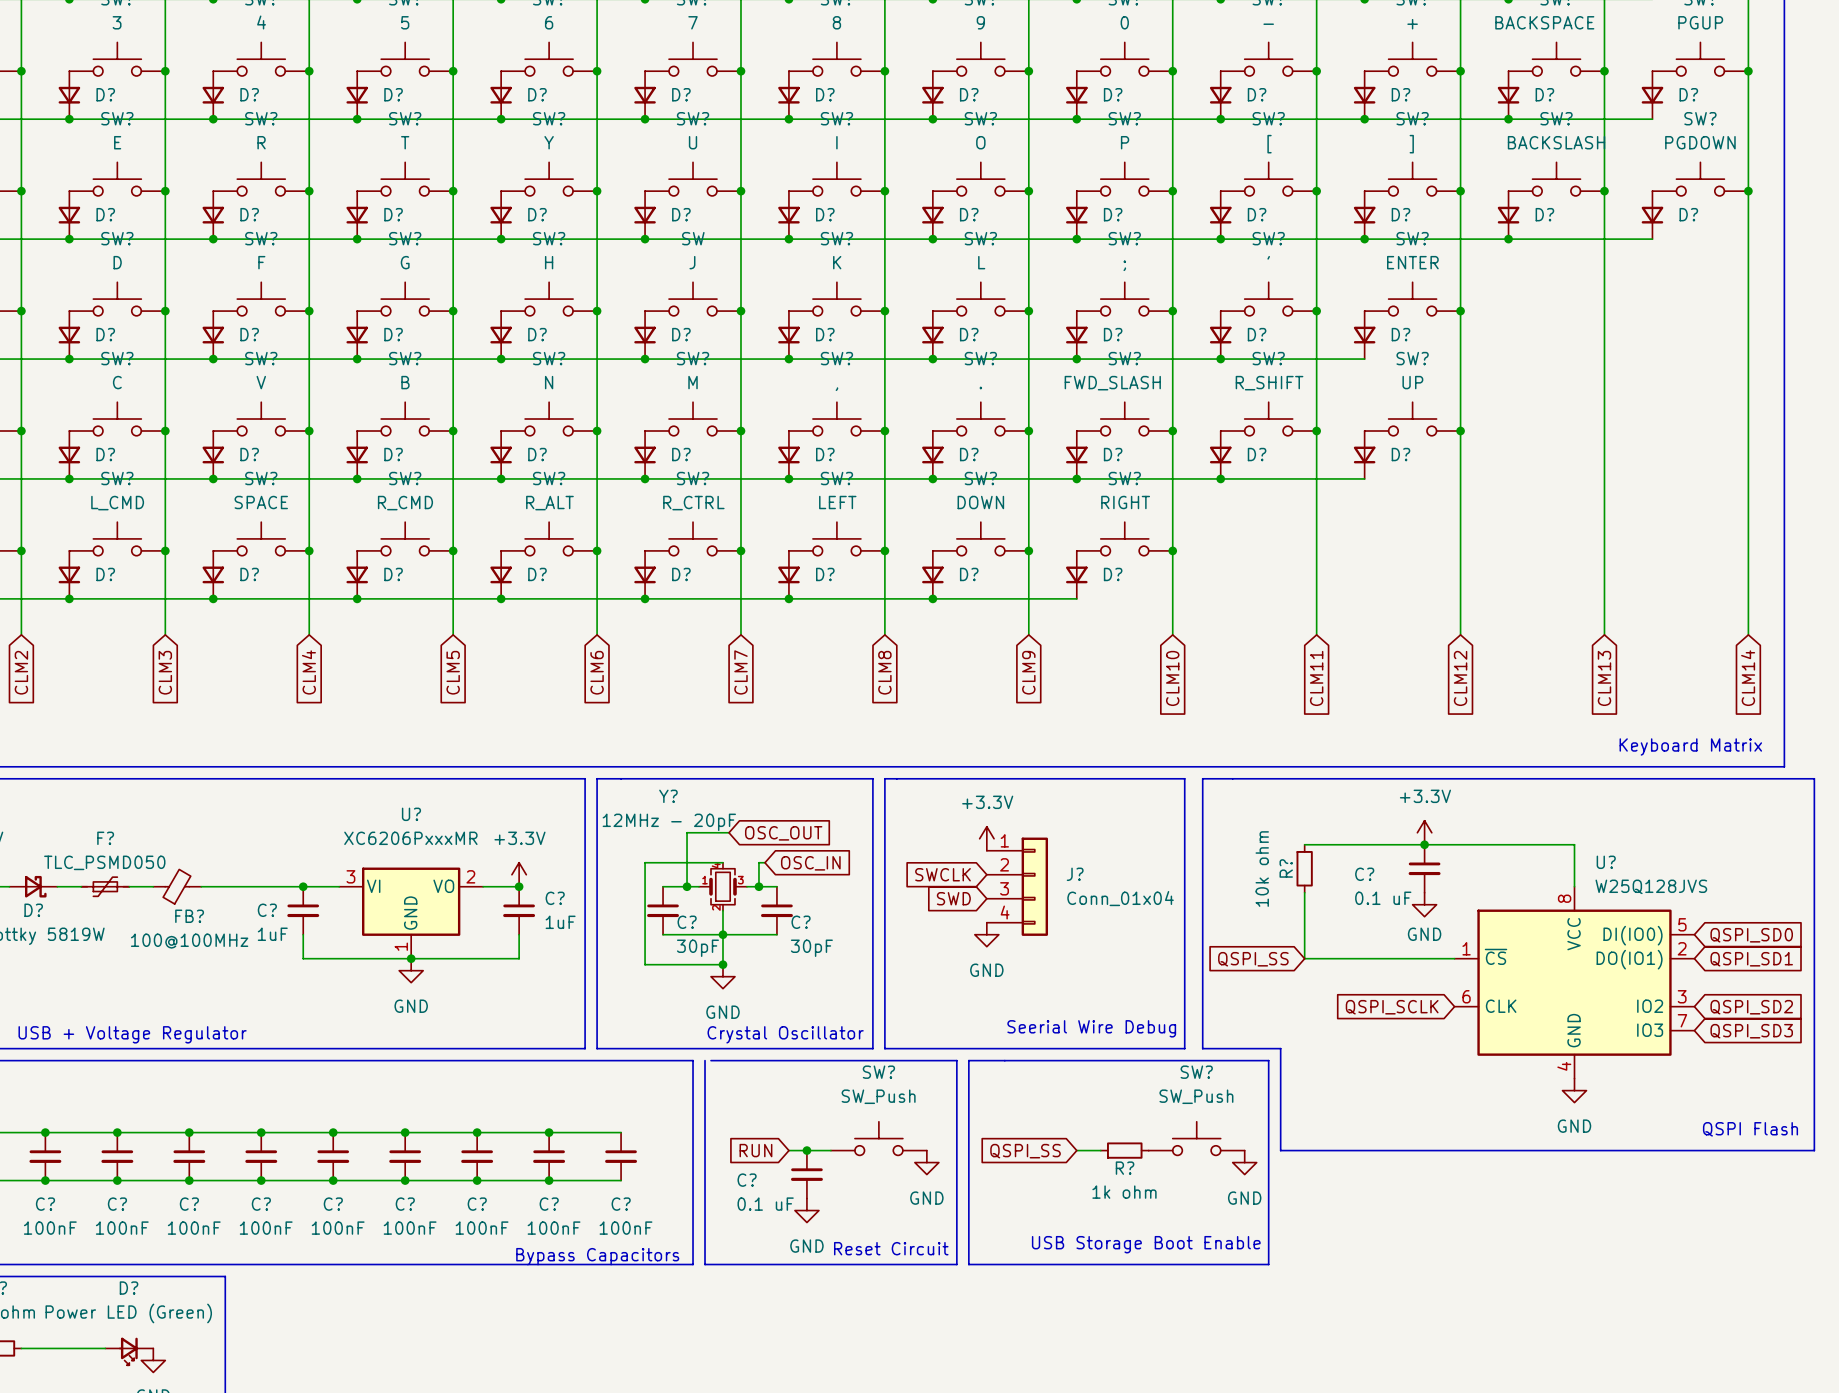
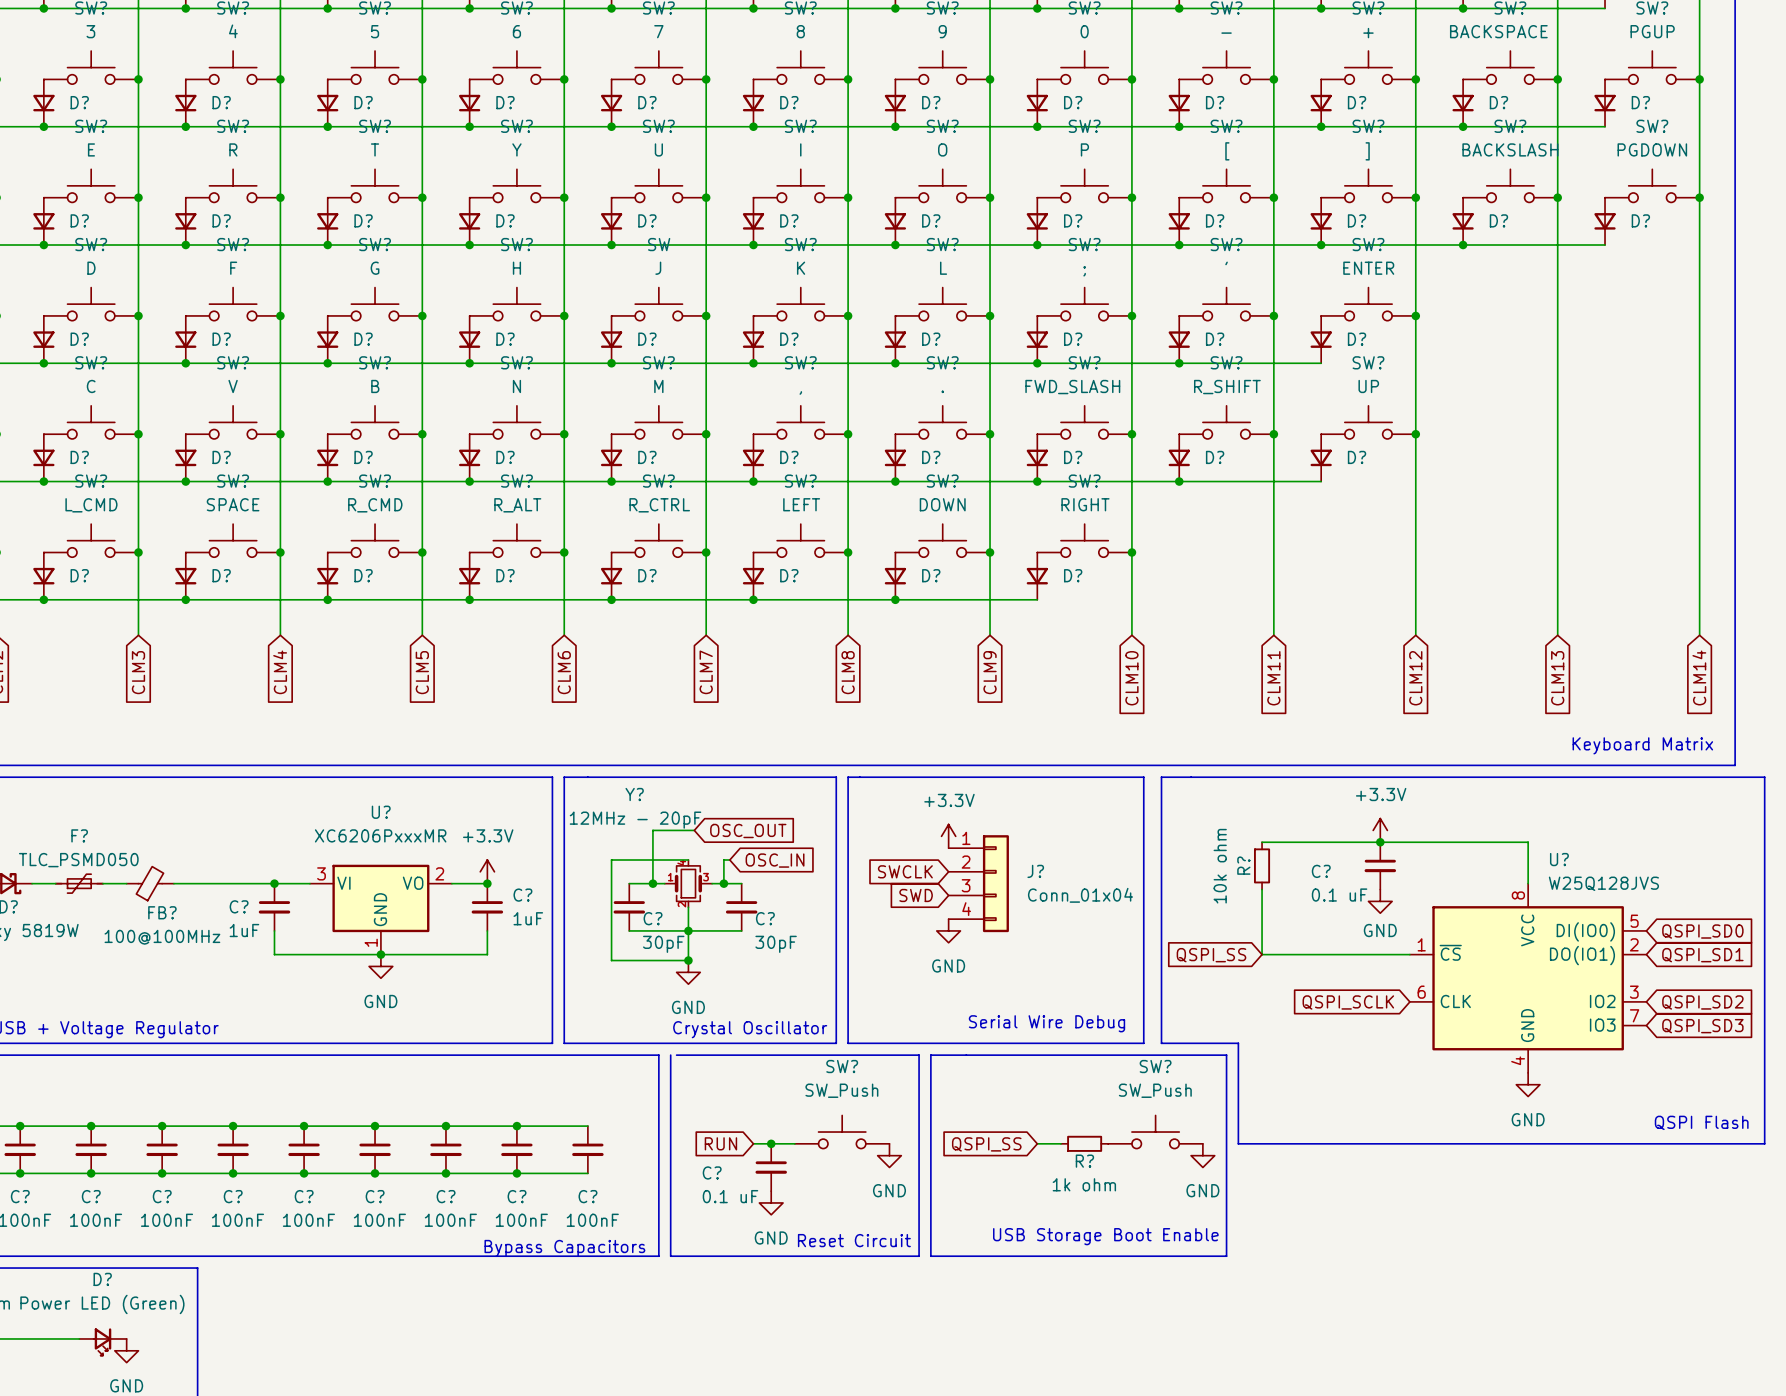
text: Seerial Wire Debug (1091, 1028) -> Serial Wire Debug (1046, 1023)

